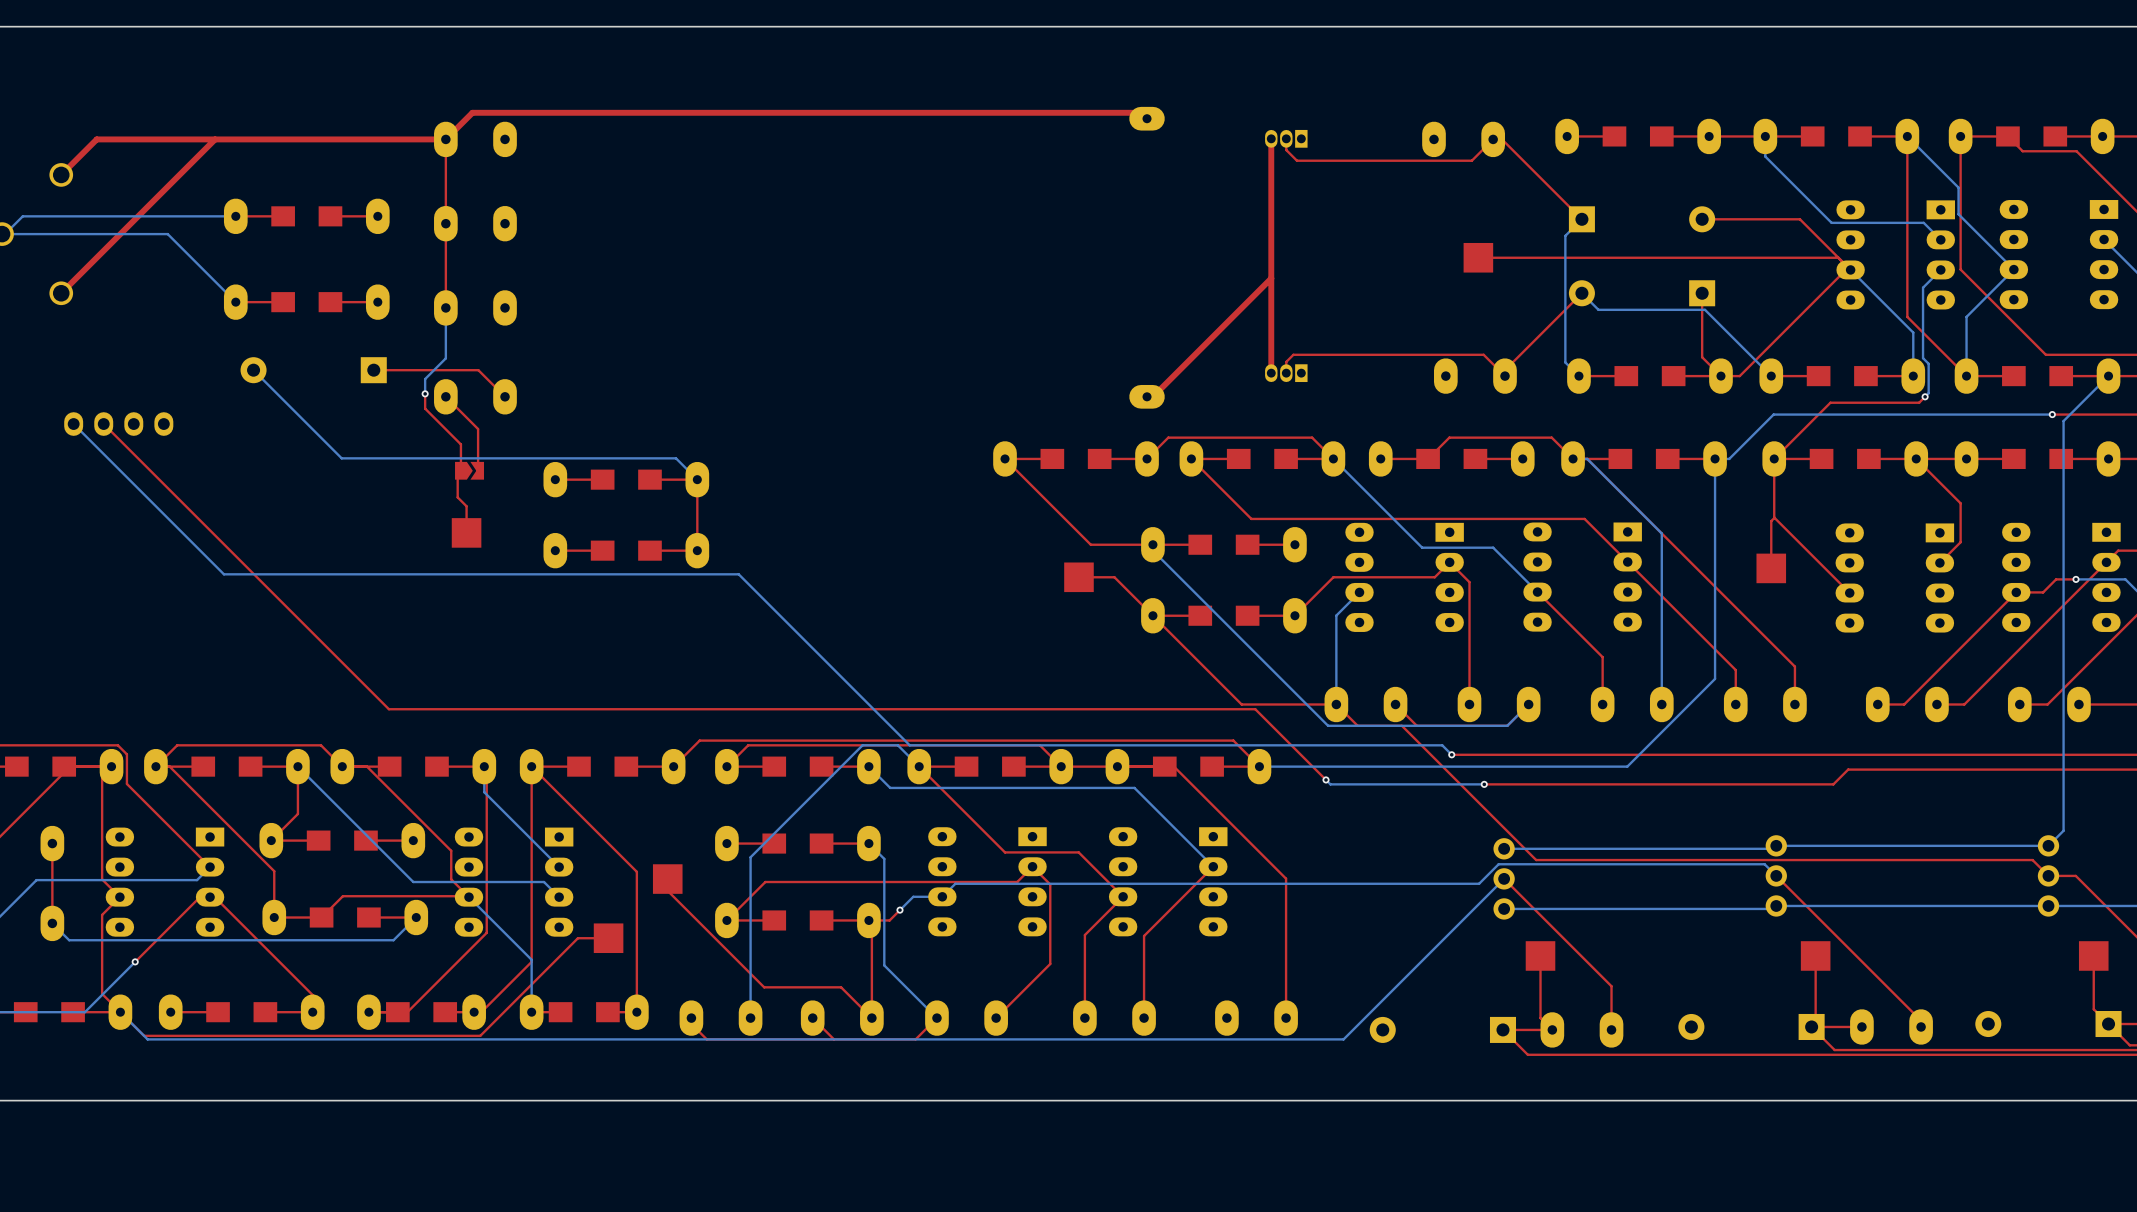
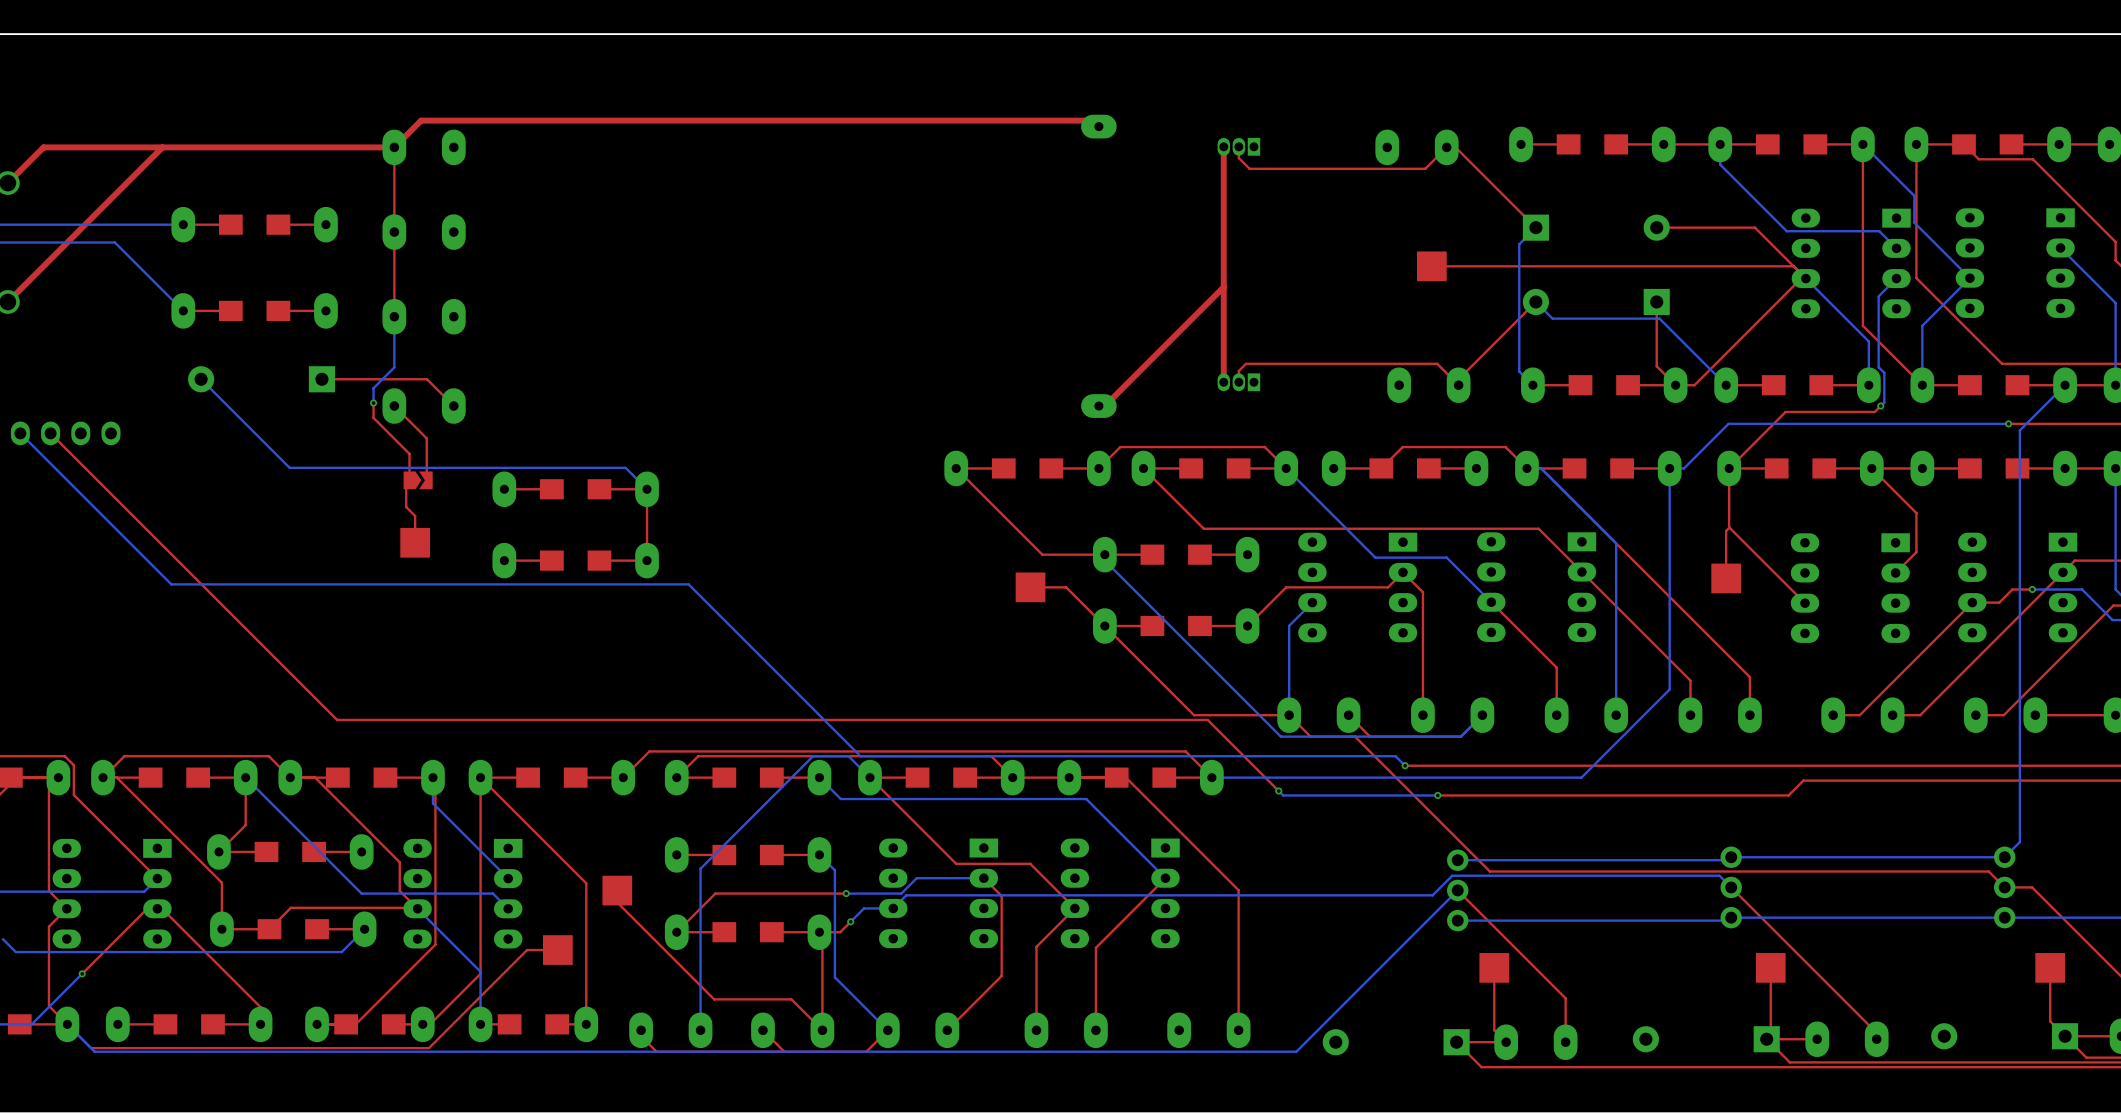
top track: (1032, 866) (1017, 882) (895, 882) -> none
bottom track: none -> (983, 878) (916, 878) (901, 893) (846, 893)
via: none -> (846, 893)

